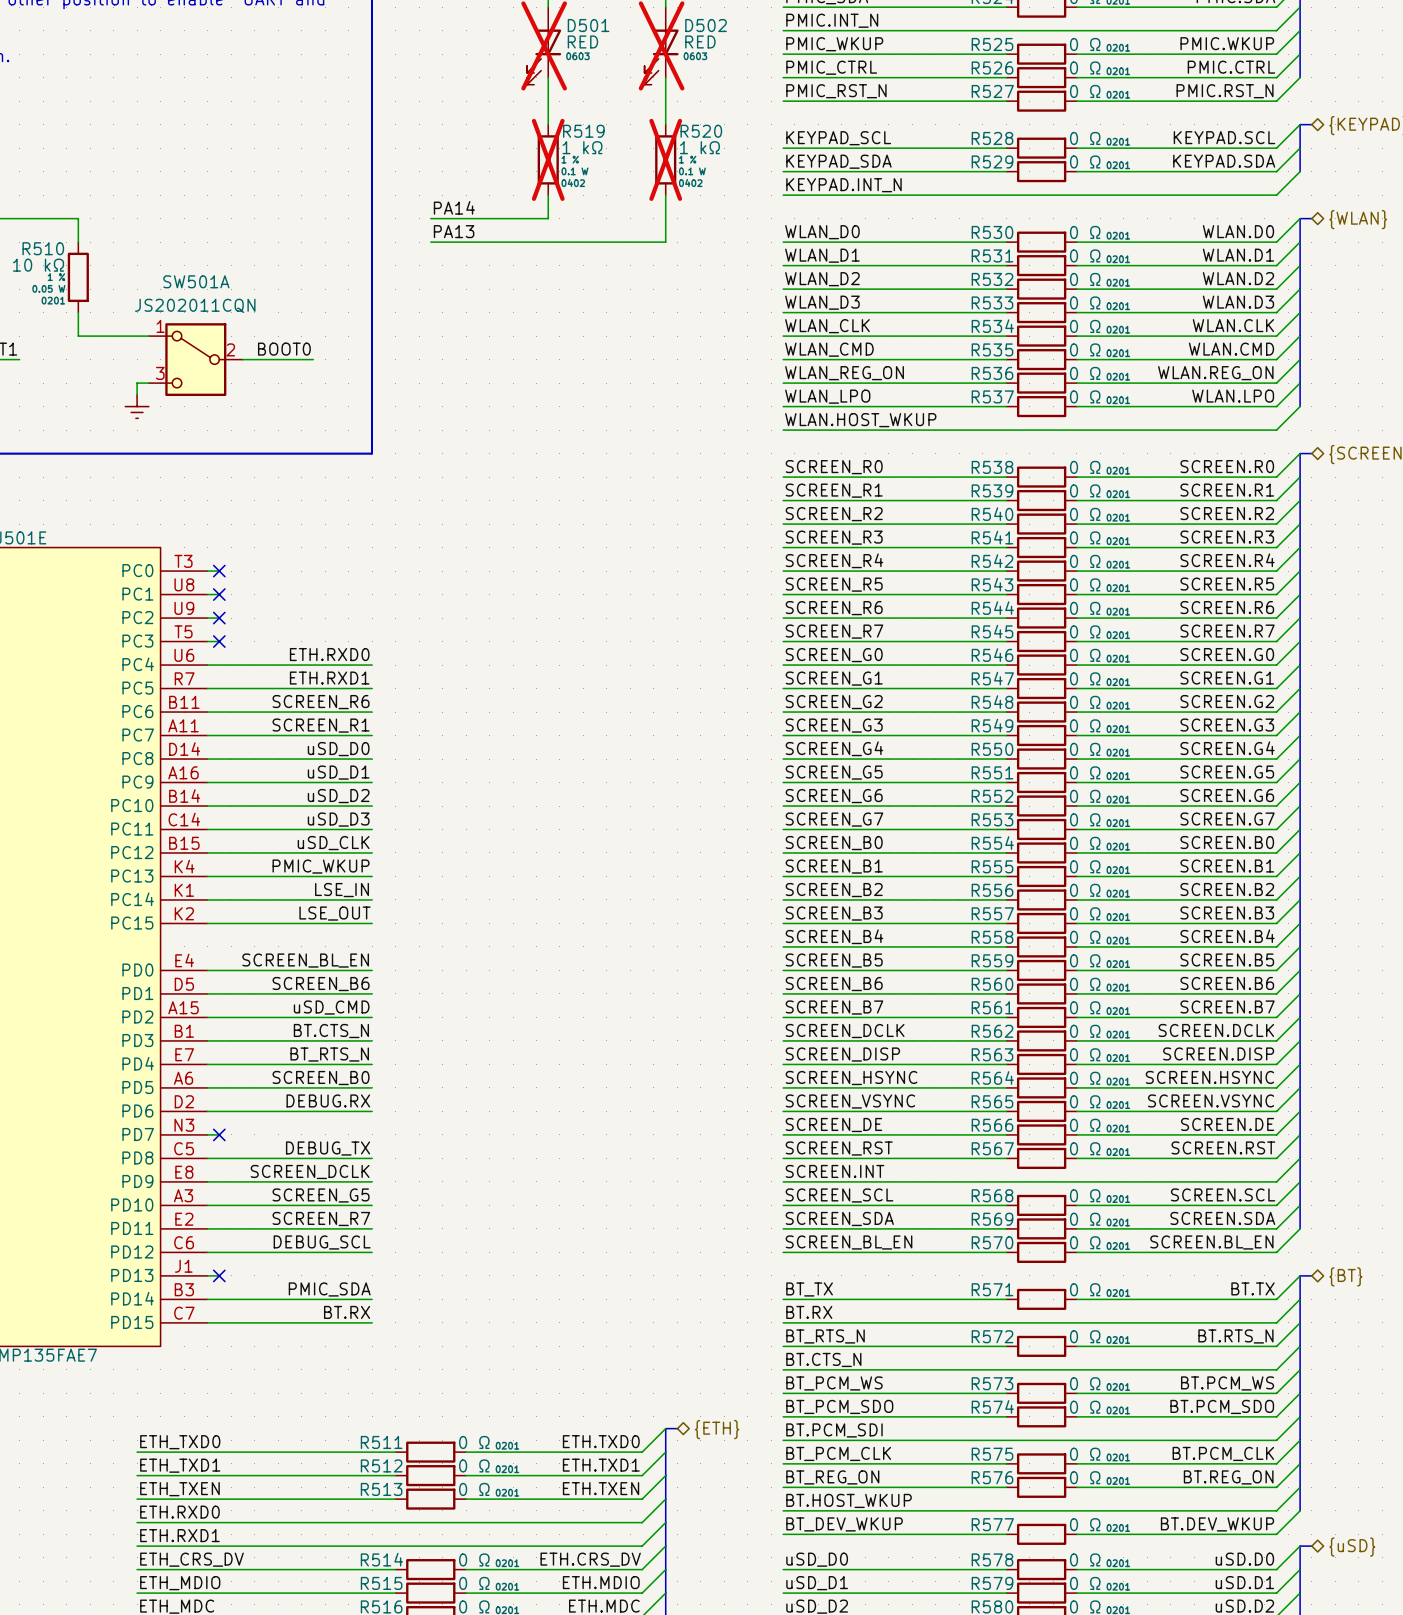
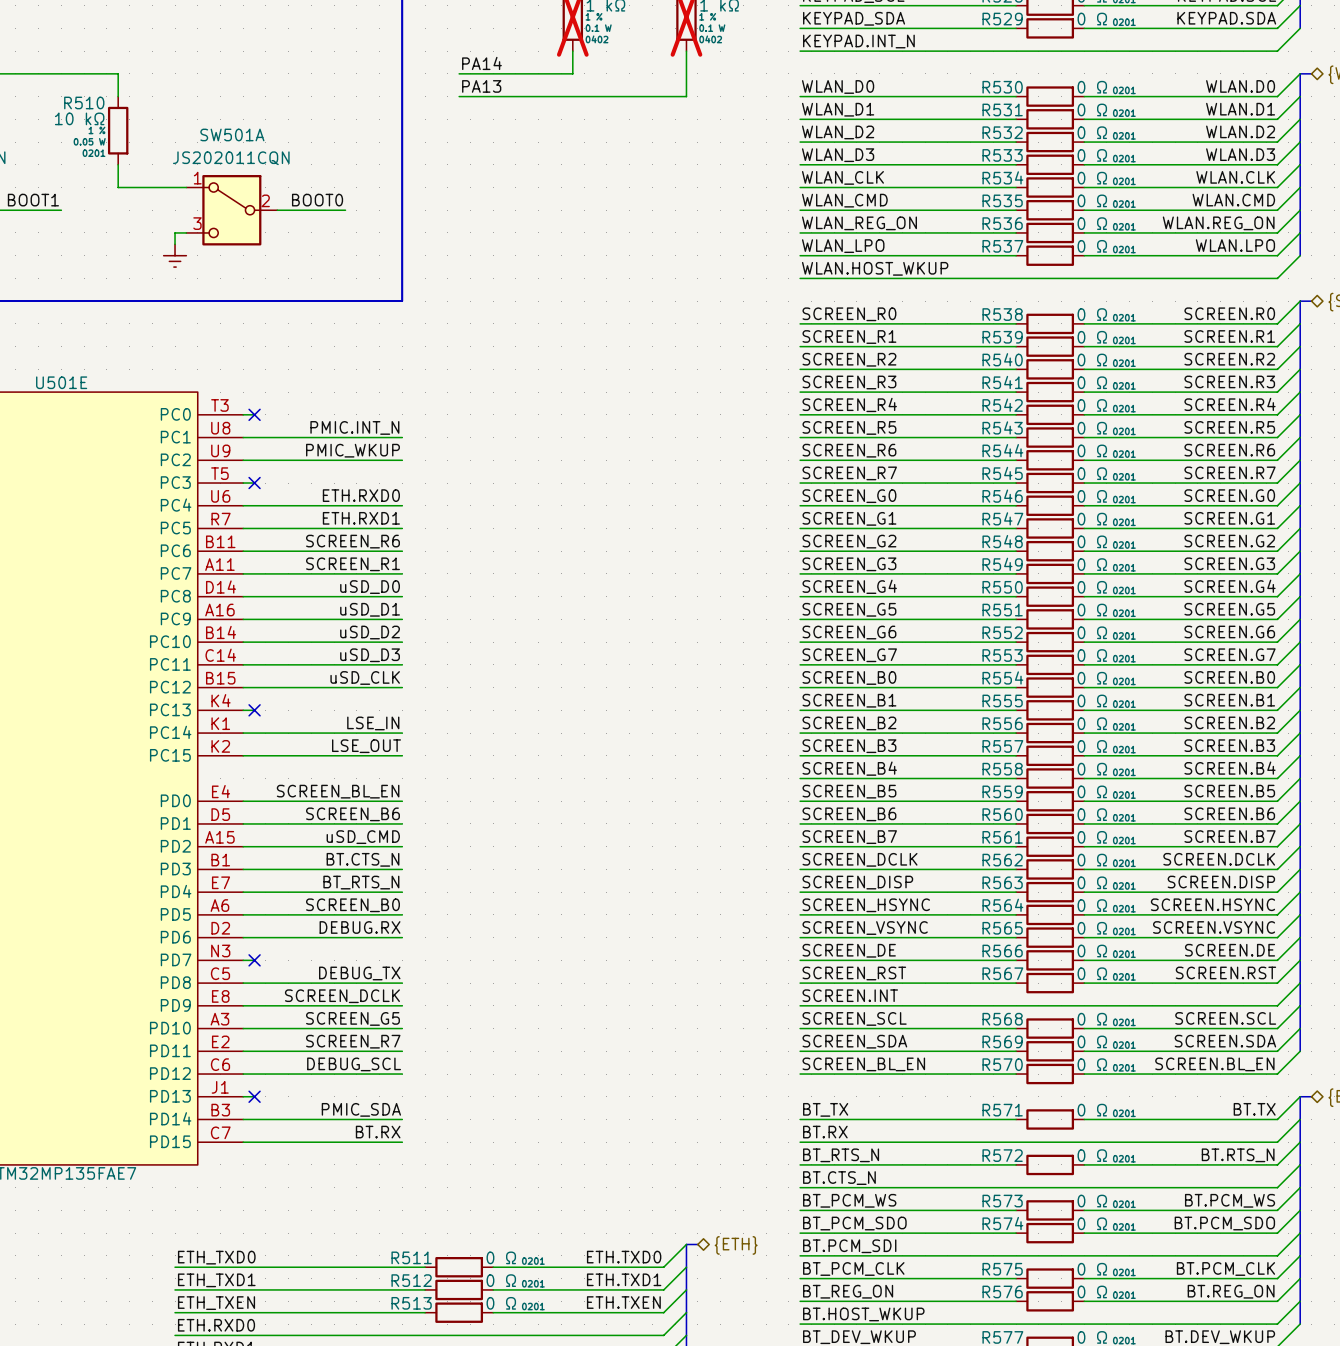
label: none -> PMIC.INT_N (354, 427)
wire: none -> (254, 437) (402, 437)
no-connect mark: (219, 594) -> none
label: none -> PMIC_WKUP (352, 450)
wire: none -> (254, 460) (402, 460)
no-connect mark: (219, 618) -> none
label: PMIC_WKUP (321, 866) -> none
wire: (219, 876) (372, 876) -> none
no-connect mark: none -> (254, 710)

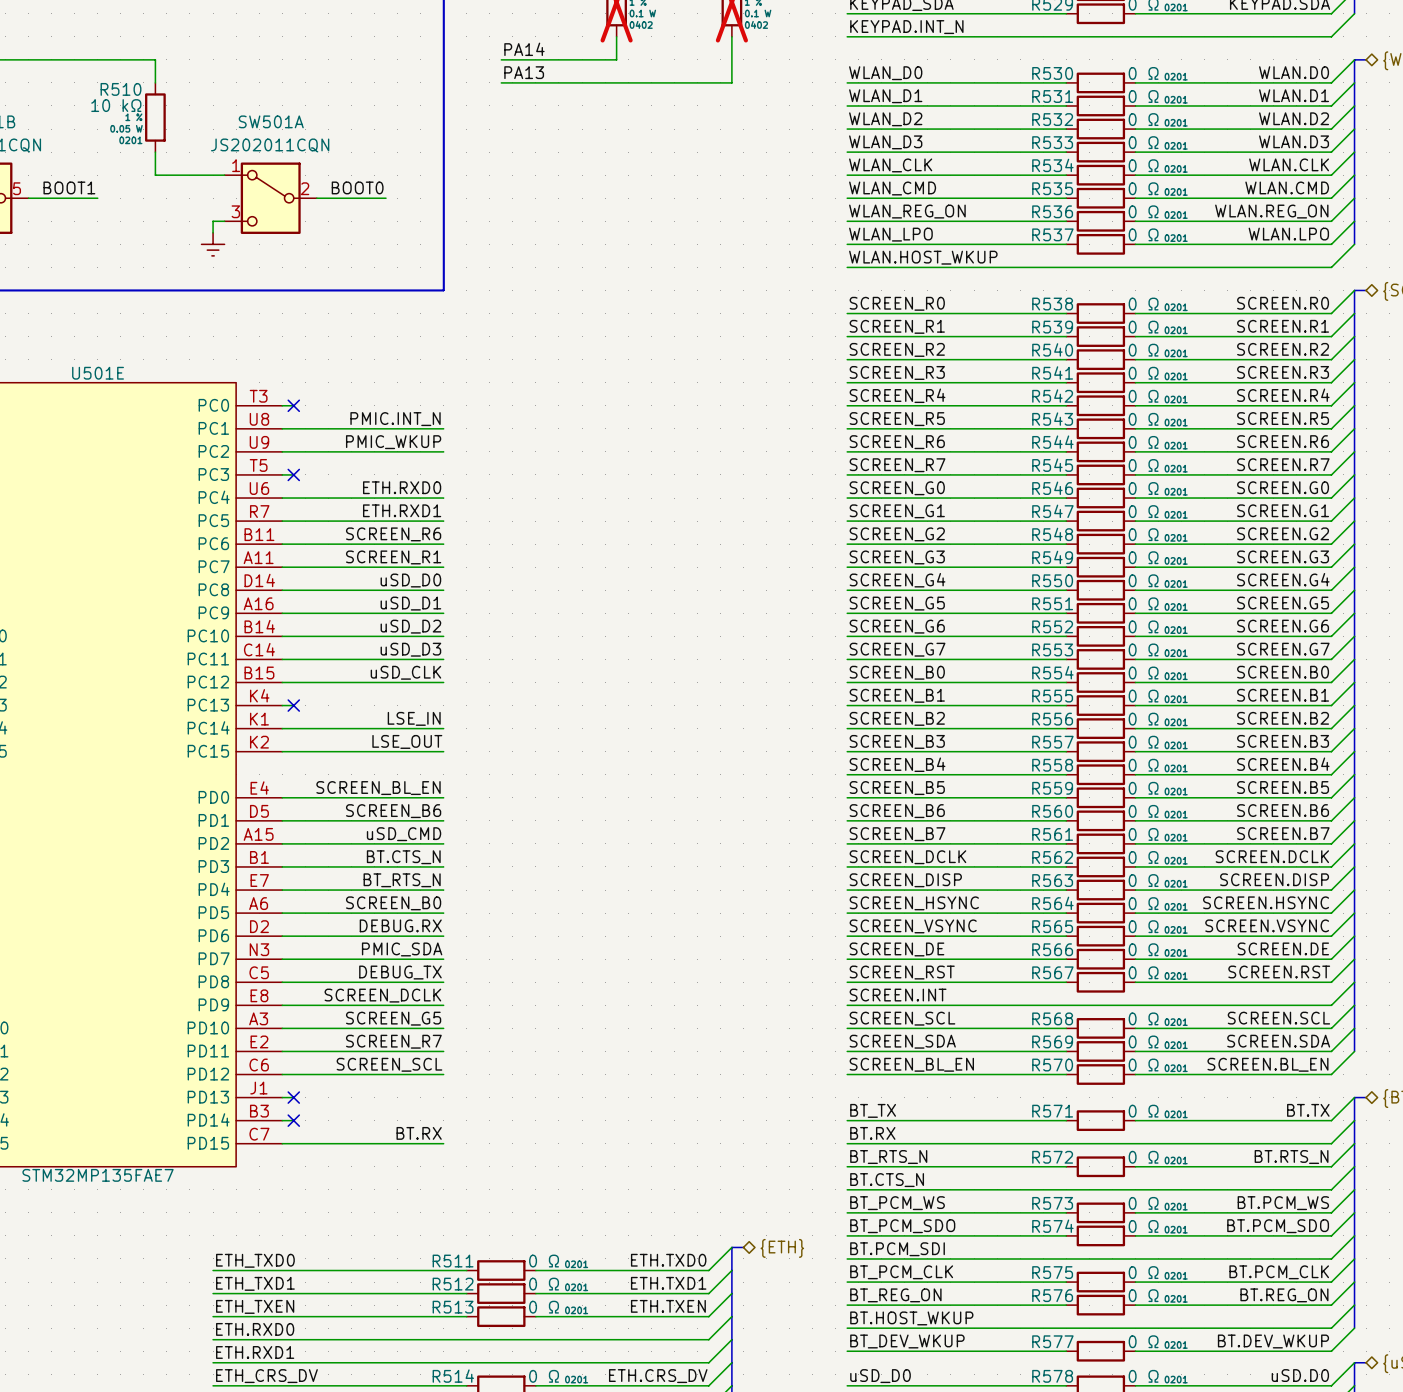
no-connect mark: (254, 960) -> none
label: DEBUG_SCL (354, 1064) -> SCREEN_SCL (389, 1064)
label position: PMIC_SDA (361, 1109) -> PMIC_SDA (402, 949)
wire: (254, 1119) (402, 1119) -> (293, 959) (443, 959)
no-connect mark: none -> (293, 1120)

